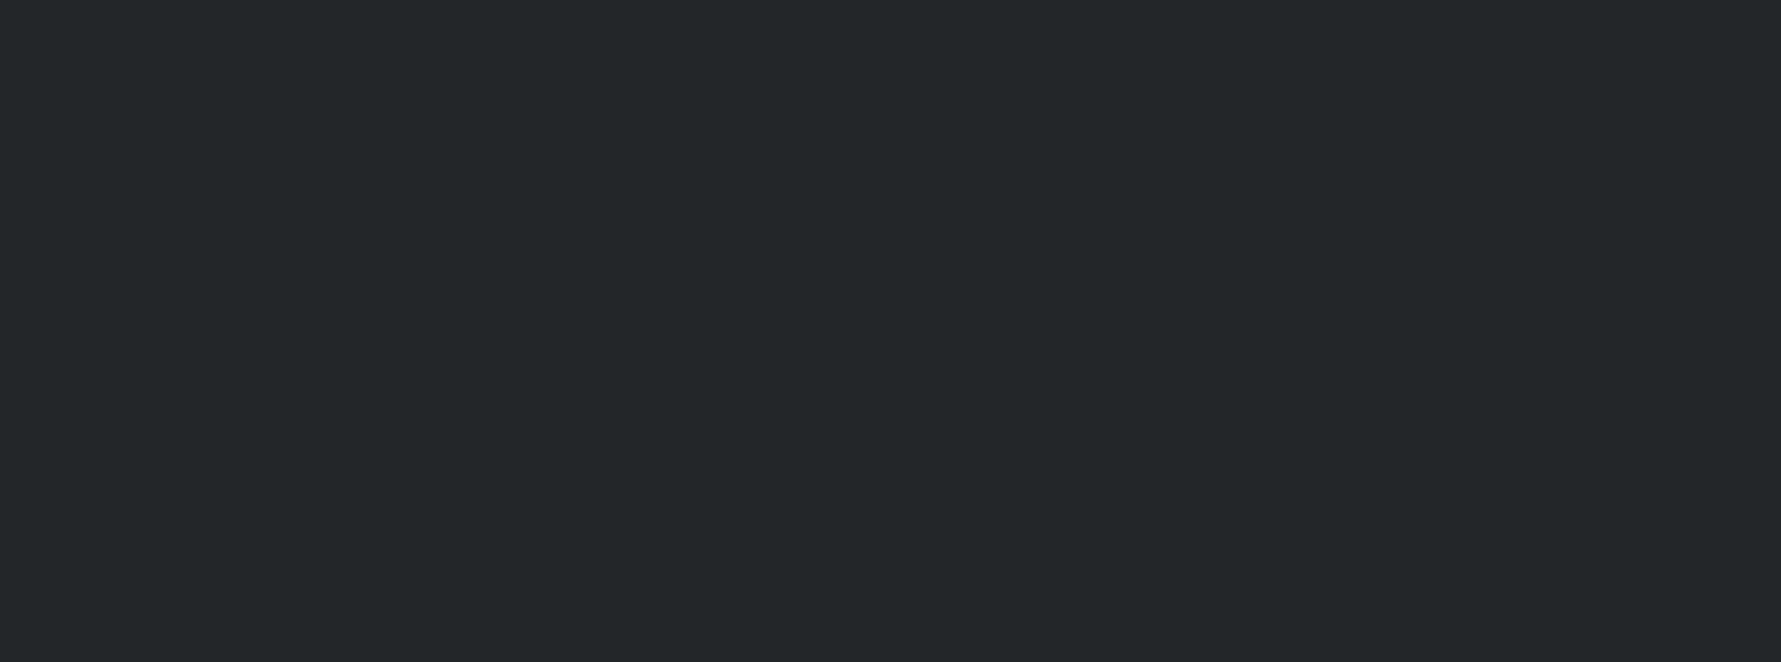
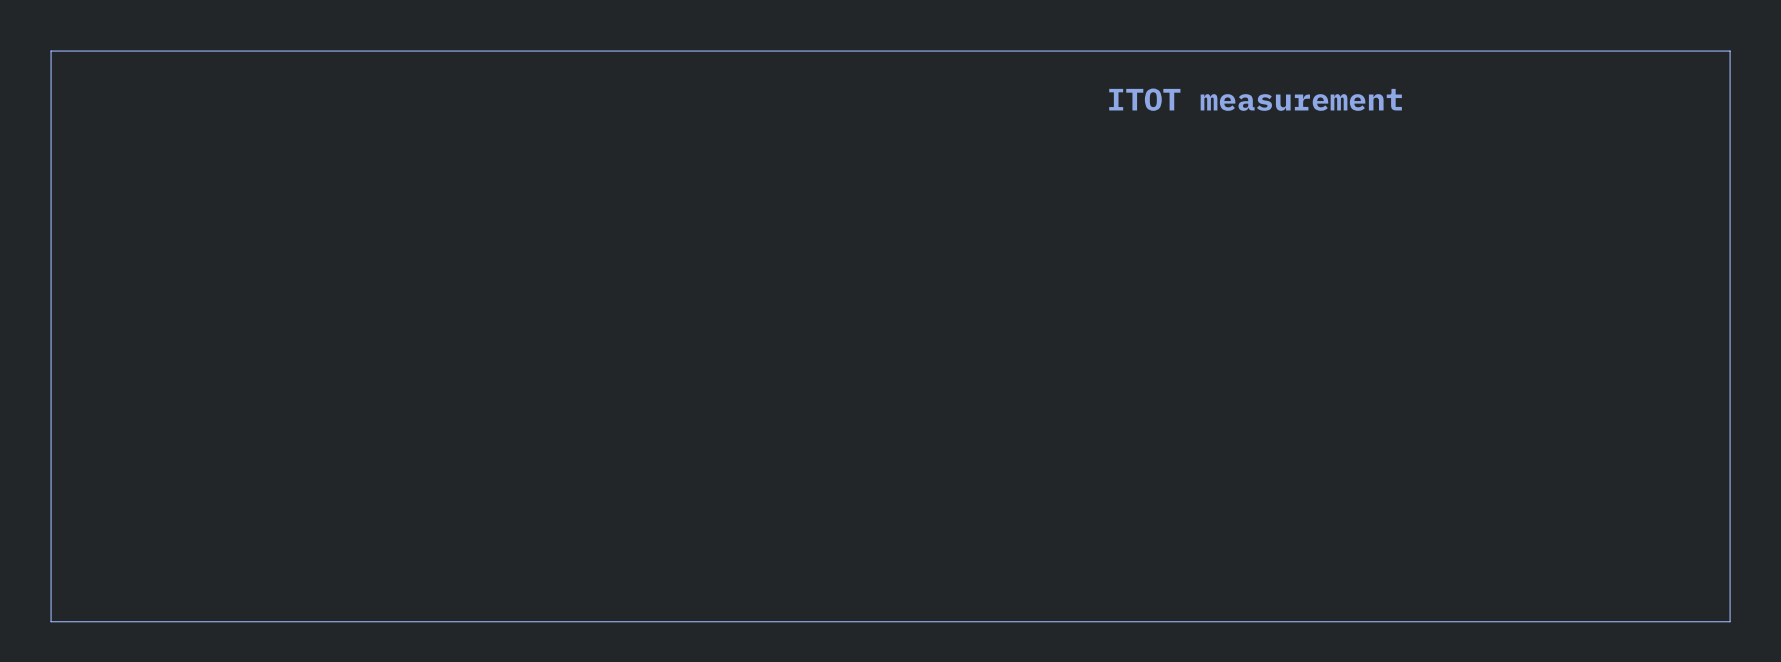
line: none -> (51, 51) (1730, 51) (1730, 621) (51, 621) (51, 51)
text: none -> ITOT measurement (1255, 99)

